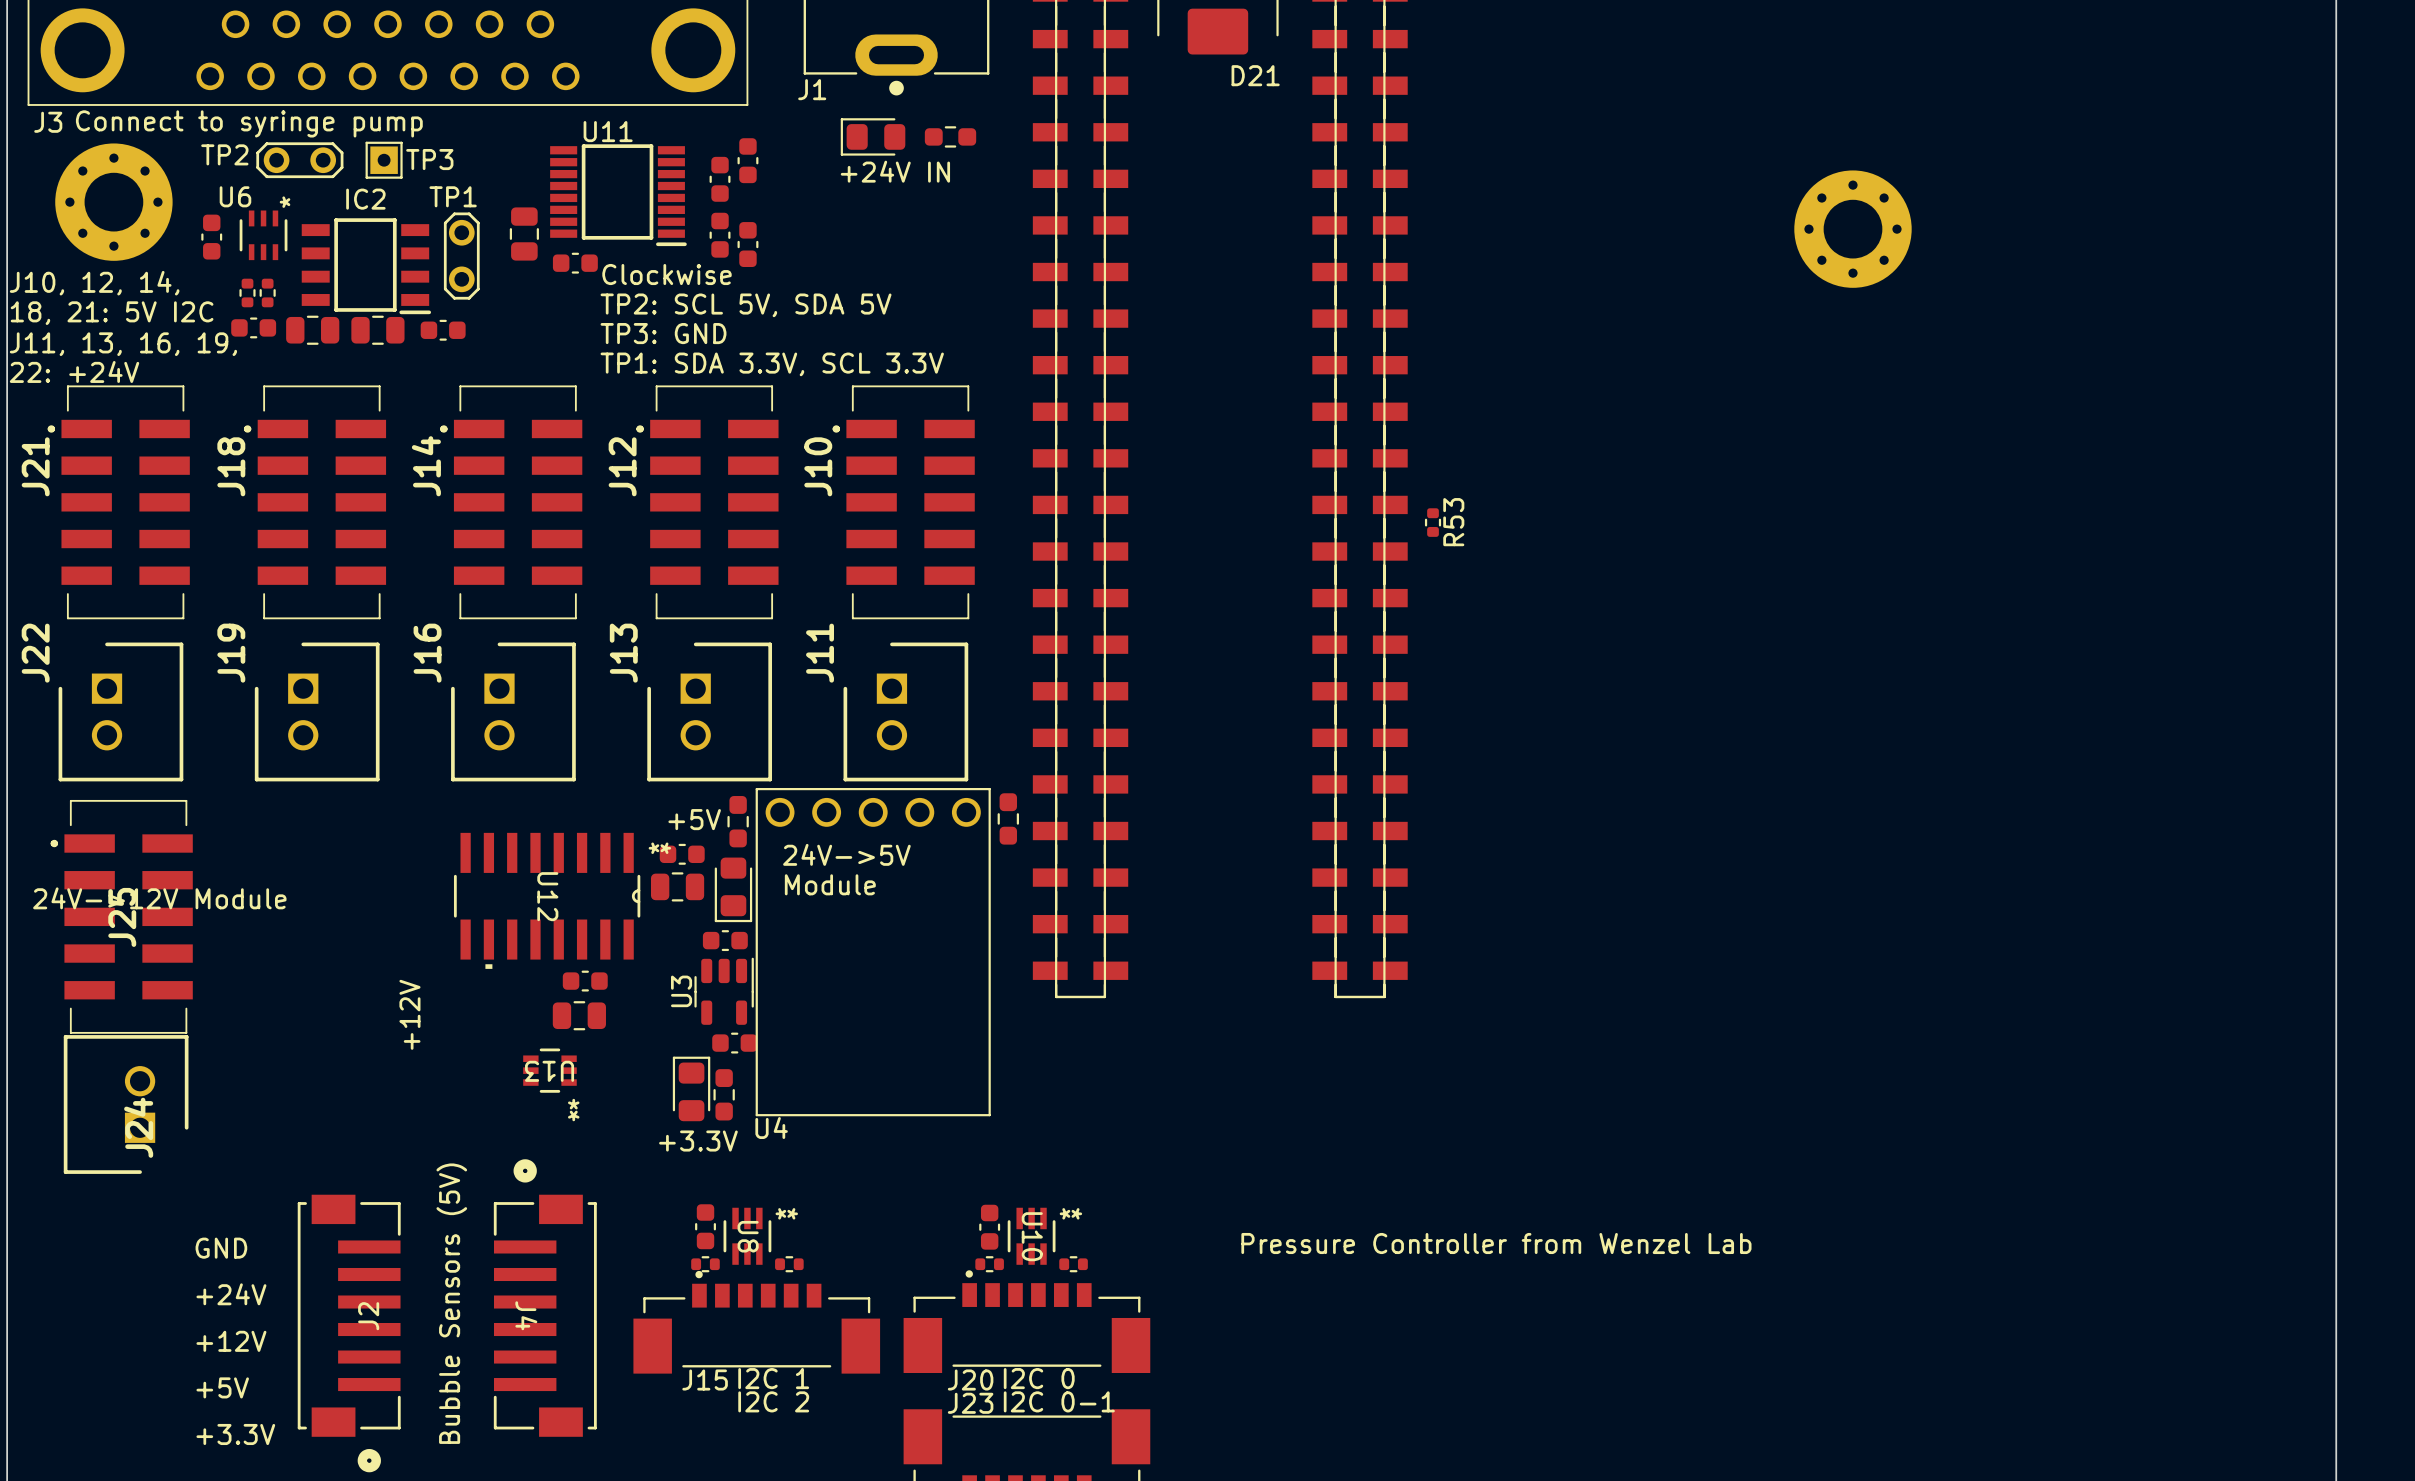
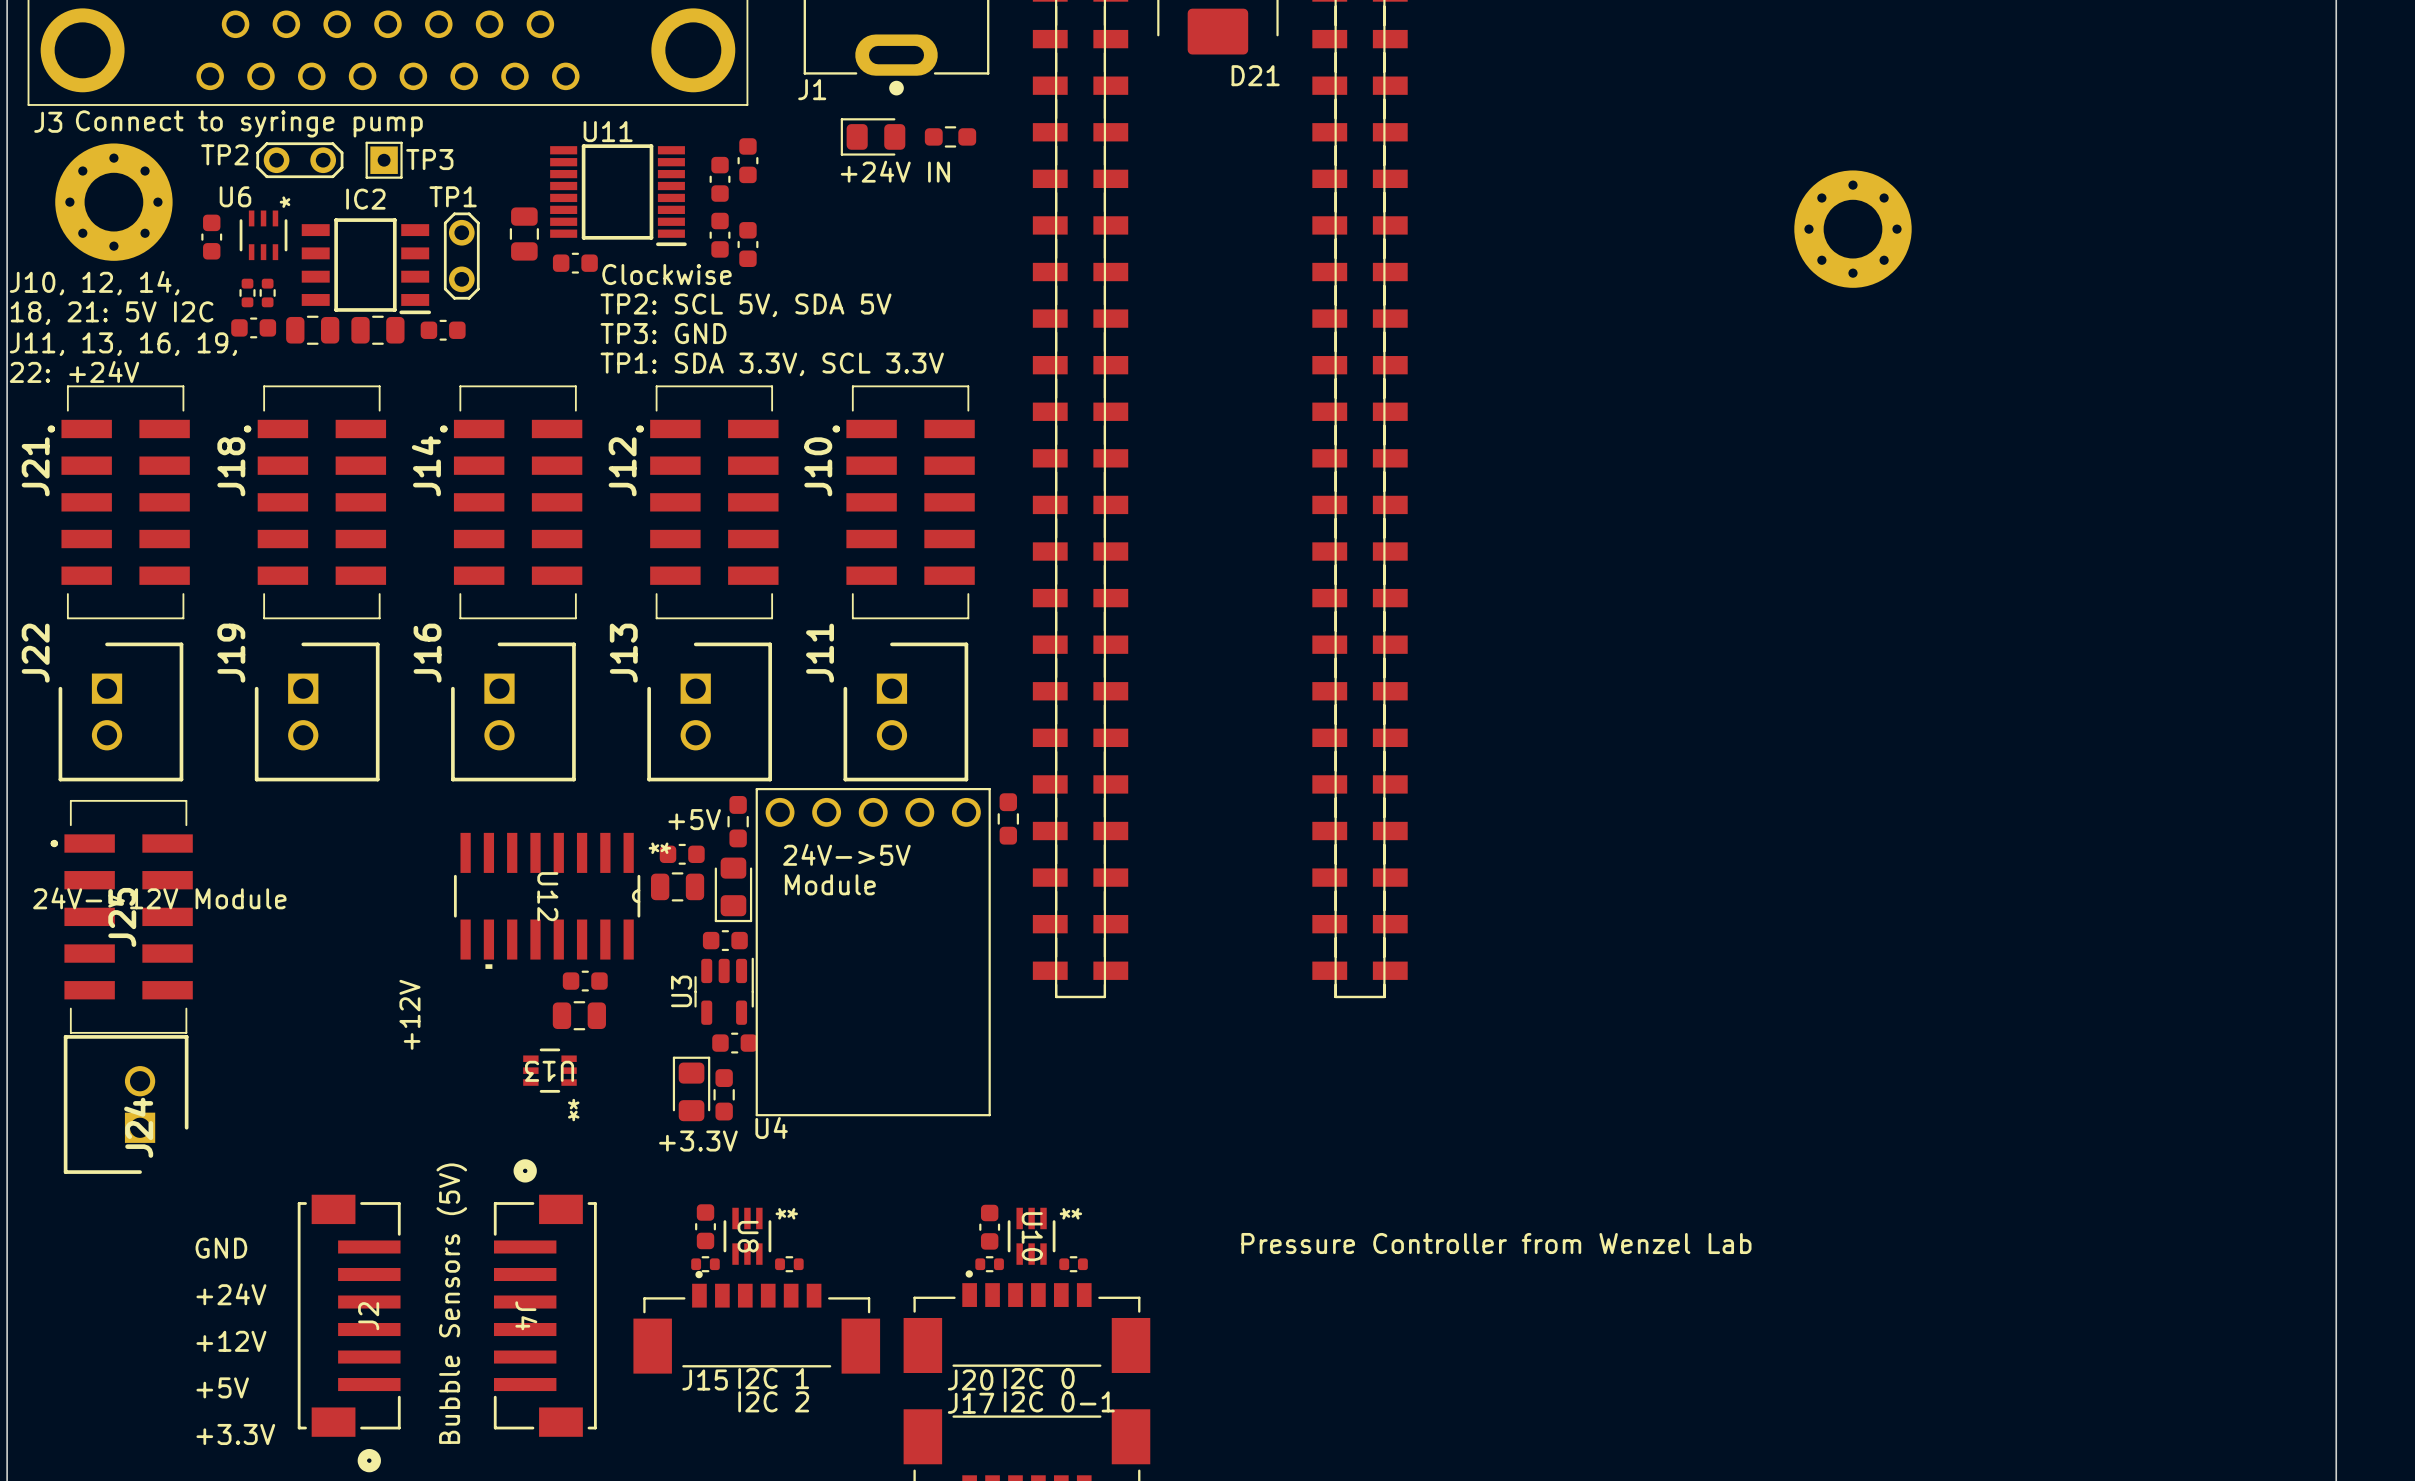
R53: (1433, 522) -> none
J23 name: J23 (970, 1403) -> J17 (971, 1403)

